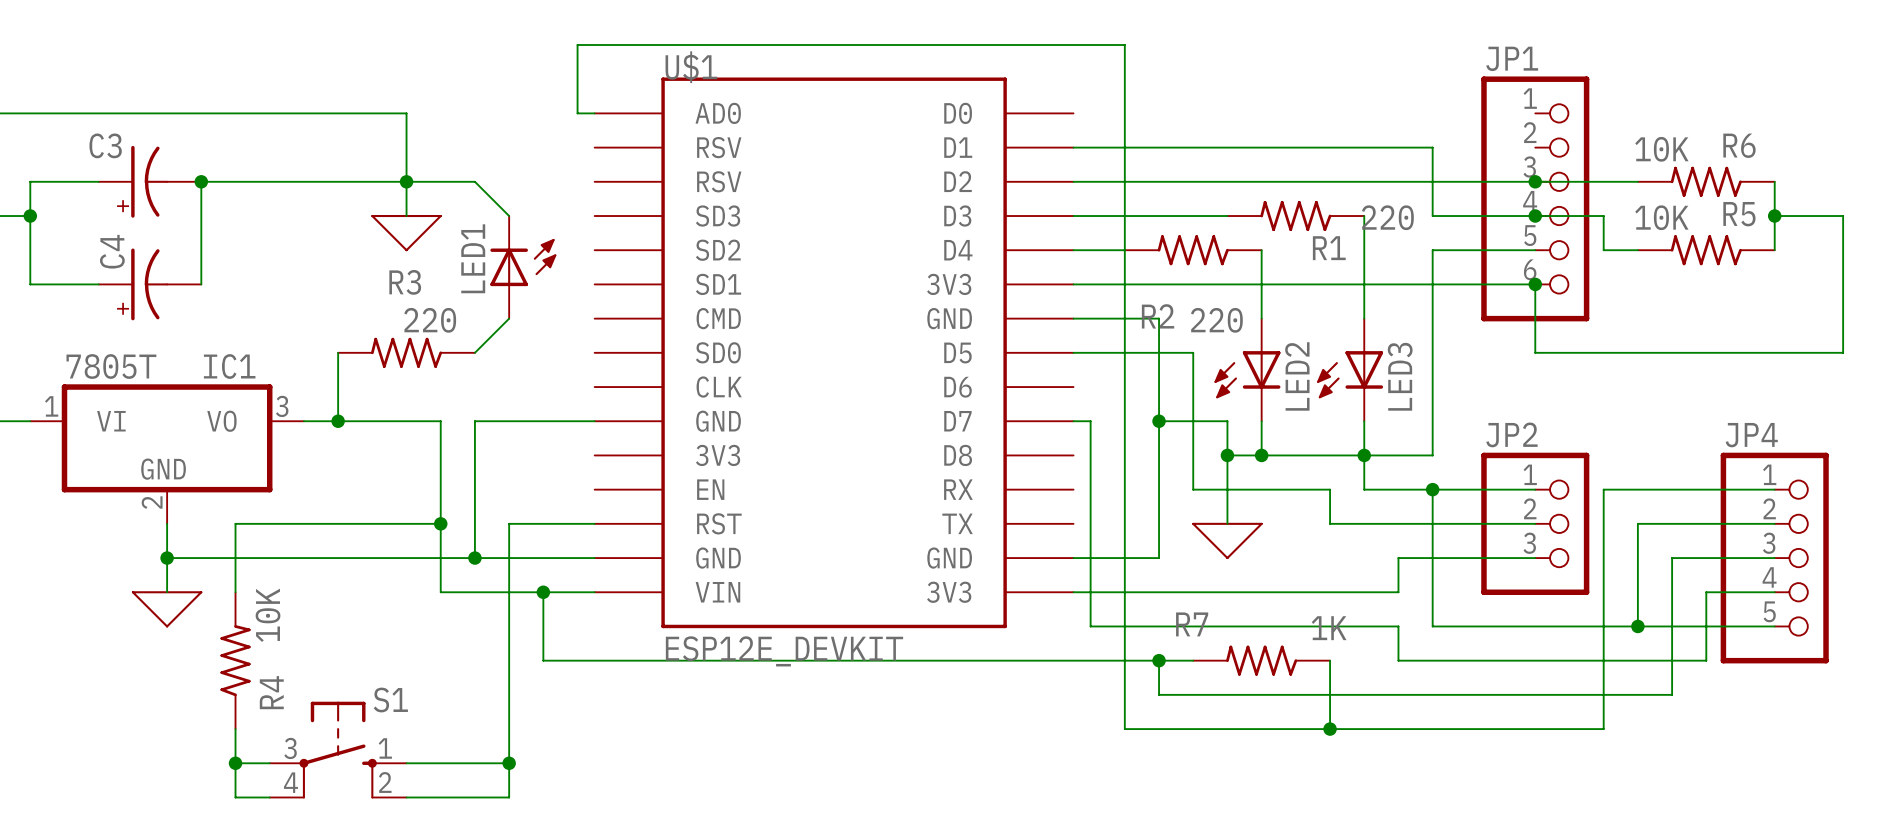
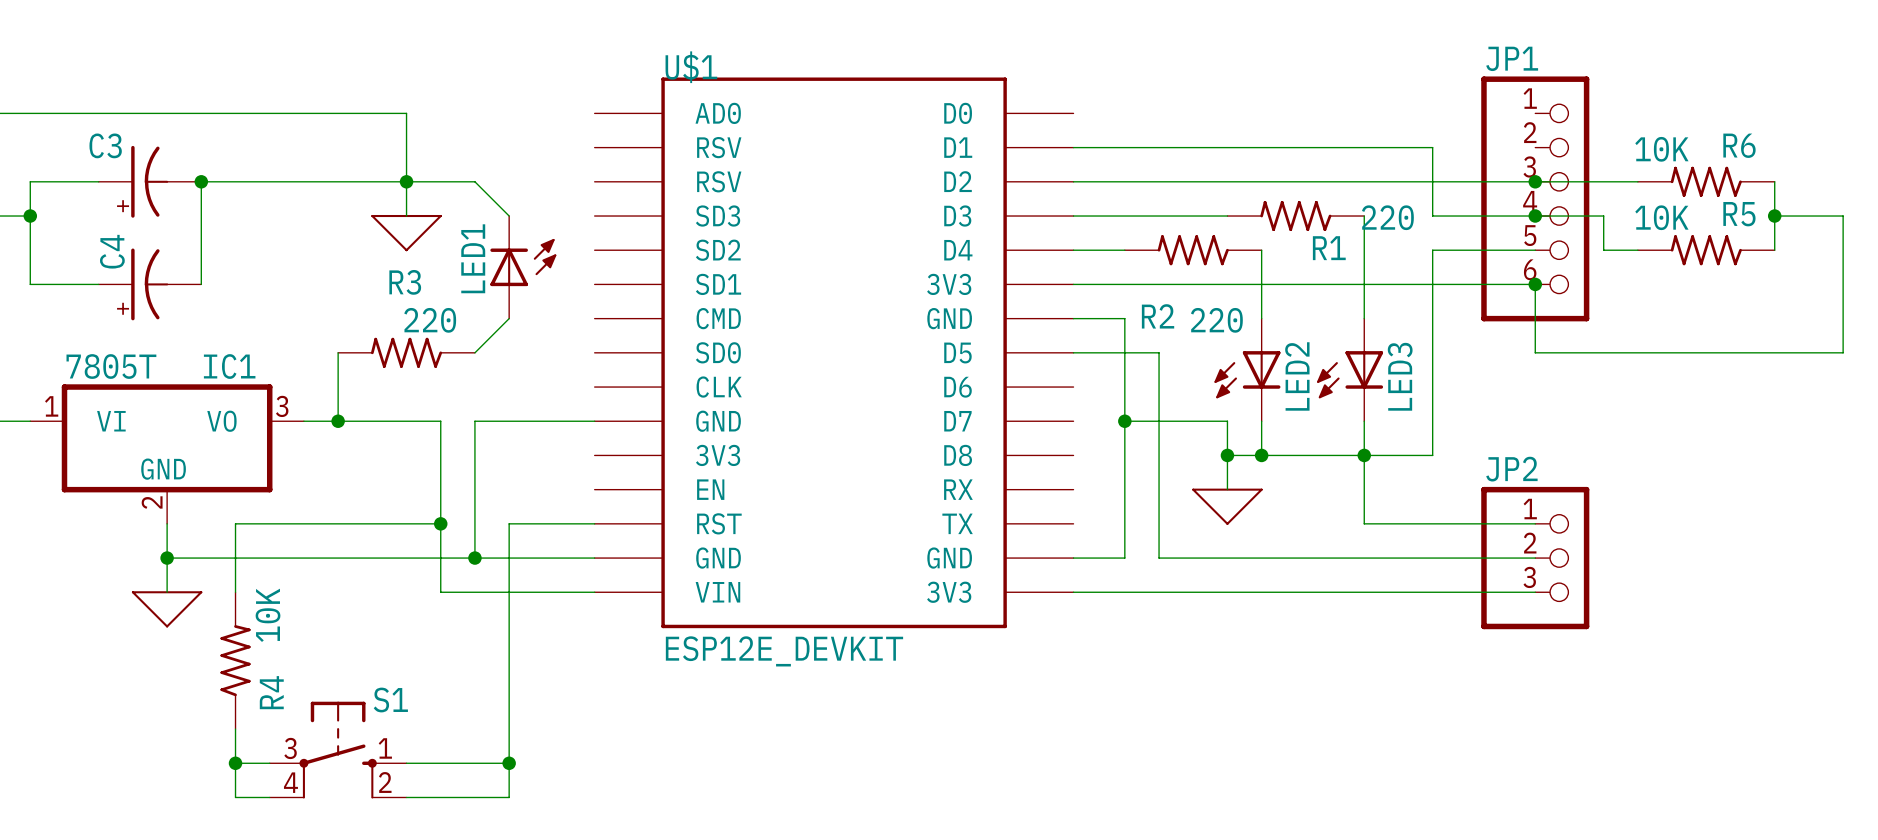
wire: (594, 113) (577, 113) (577, 44) (1124, 44) (1124, 318) (1159, 318) (1159, 352) (1193, 352) (1193, 489) (1330, 489) (1330, 523) (1364, 523) -> none
wire: (1073, 421) (1090, 421) (1090, 626) (1398, 626) (1398, 660) (1706, 660) (1706, 592) (1774, 592) -> none
wire: none -> (1124, 421) (1159, 421)
junction position: (1159, 421) -> (1124, 421)
wire: (1227, 489) (1227, 523) -> none
wire: (1364, 489) (1535, 489) -> (1364, 489) (1364, 523)
wire: (1432, 489) (1432, 626) (1774, 626) -> none
junction: (1432, 489) -> none
wire: (1774, 489) (1603, 489) (1603, 729) (1124, 729) (1124, 558) (1159, 558) -> (1398, 558) (1159, 558)
JP2 position: (1535, 523) -> (1535, 558)
wire: (1774, 523) (1637, 523) (1637, 626) -> none
power symbol position: (1227, 540) -> (1227, 506)
wire: (1398, 558) (1398, 592) -> (1535, 592) (1398, 592)
wire: (1774, 558) (1672, 558) (1672, 694) (1159, 694) (1159, 660) -> none
JP4: (1774, 558) -> none
wire: (543, 592) (543, 660) (1193, 660) -> none
junction: (543, 592) -> none
junction: (1637, 626) -> none
junction: (1159, 660) -> none
R7: 1K (1261, 660) -> none
wire: (1330, 660) (1330, 729) -> none
junction: (1330, 729) -> none

